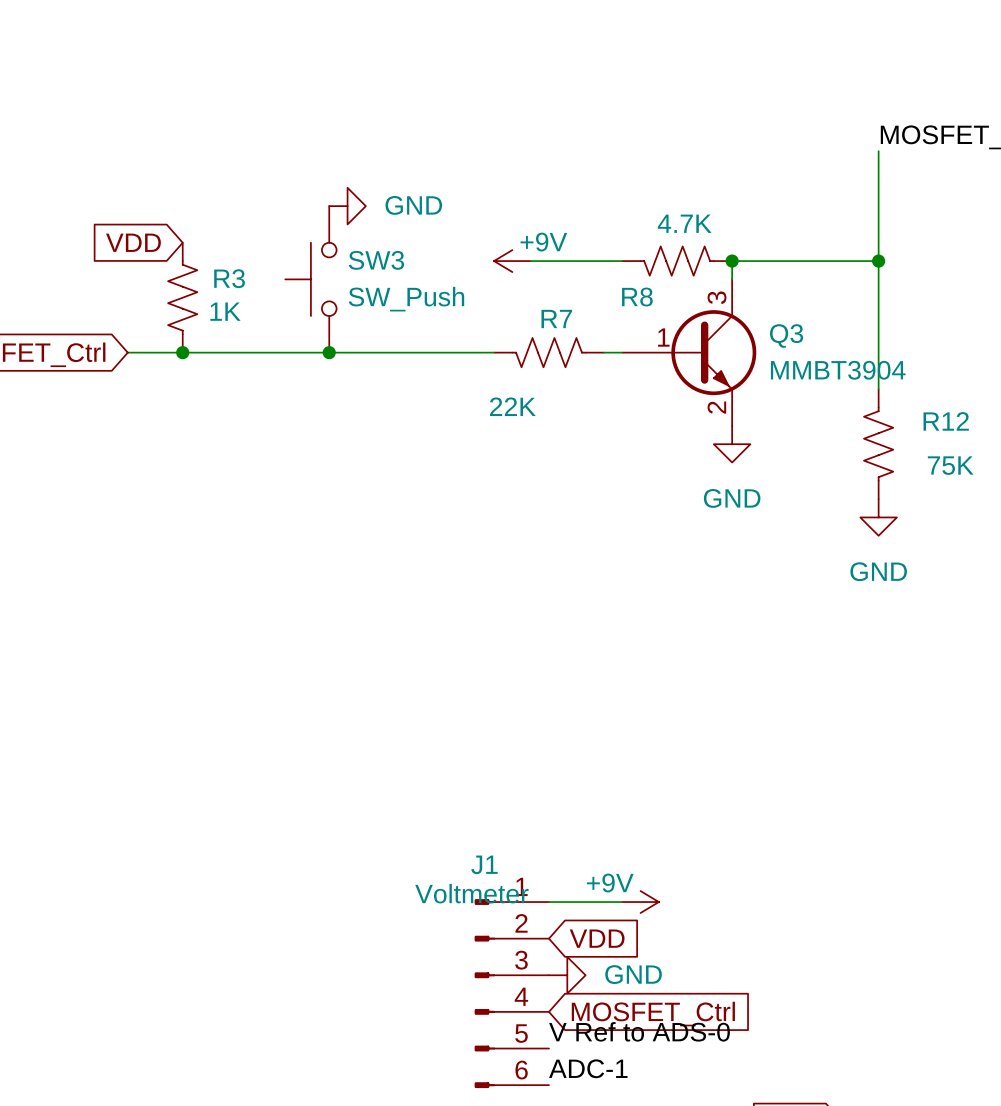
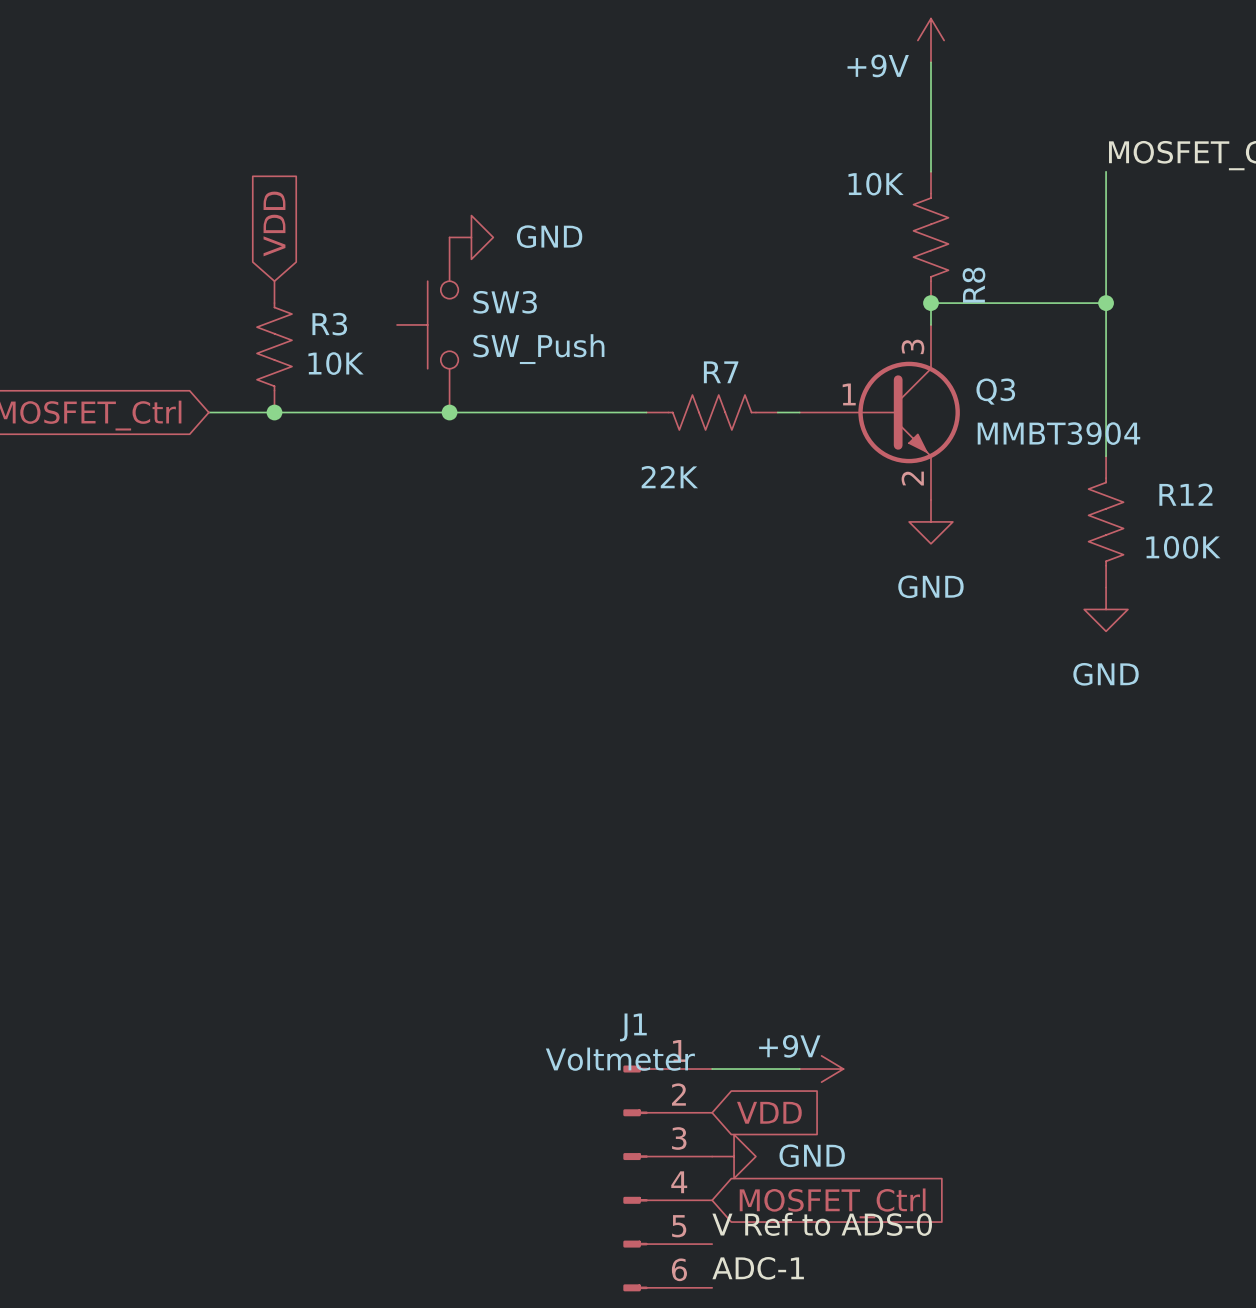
wire: none -> (931, 62) (931, 171)
R8 value: 4.7K (684, 223) -> 10K (876, 184)
global label rotation: 0° (133, 242) -> 90° clockwise (274, 223)
power symbol text position: +9V (543, 242) -> +9V (878, 65)
power symbol rotation: 0° (512, 261) -> 90° clockwise (931, 40)
power symbol position: +9V (512, 261) -> +9V (931, 40)
wire: (530, 261) (622, 261) -> none
R8 rotation: 0° (677, 261) -> 90° clockwise (931, 237)
R8 position: (677, 261) -> (931, 237)
R8 name position: R8 (637, 297) -> R8 (973, 285)
R3 value: 1K (225, 311) -> 10K (336, 363)
R12 value: 75K (950, 465) -> 100K (1183, 547)

